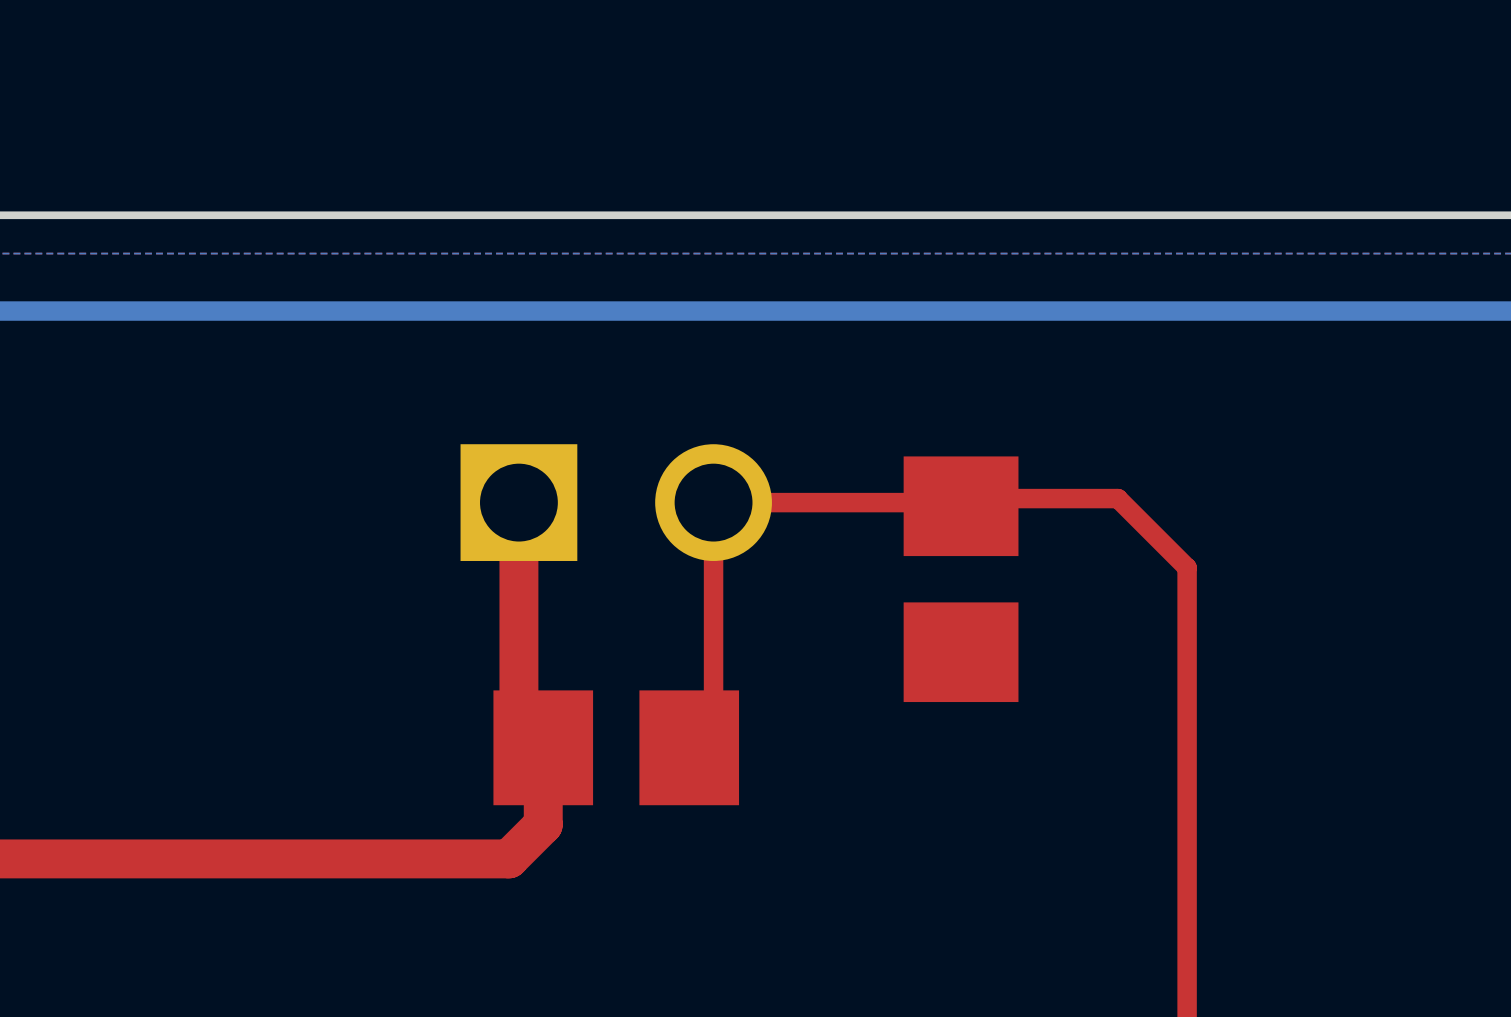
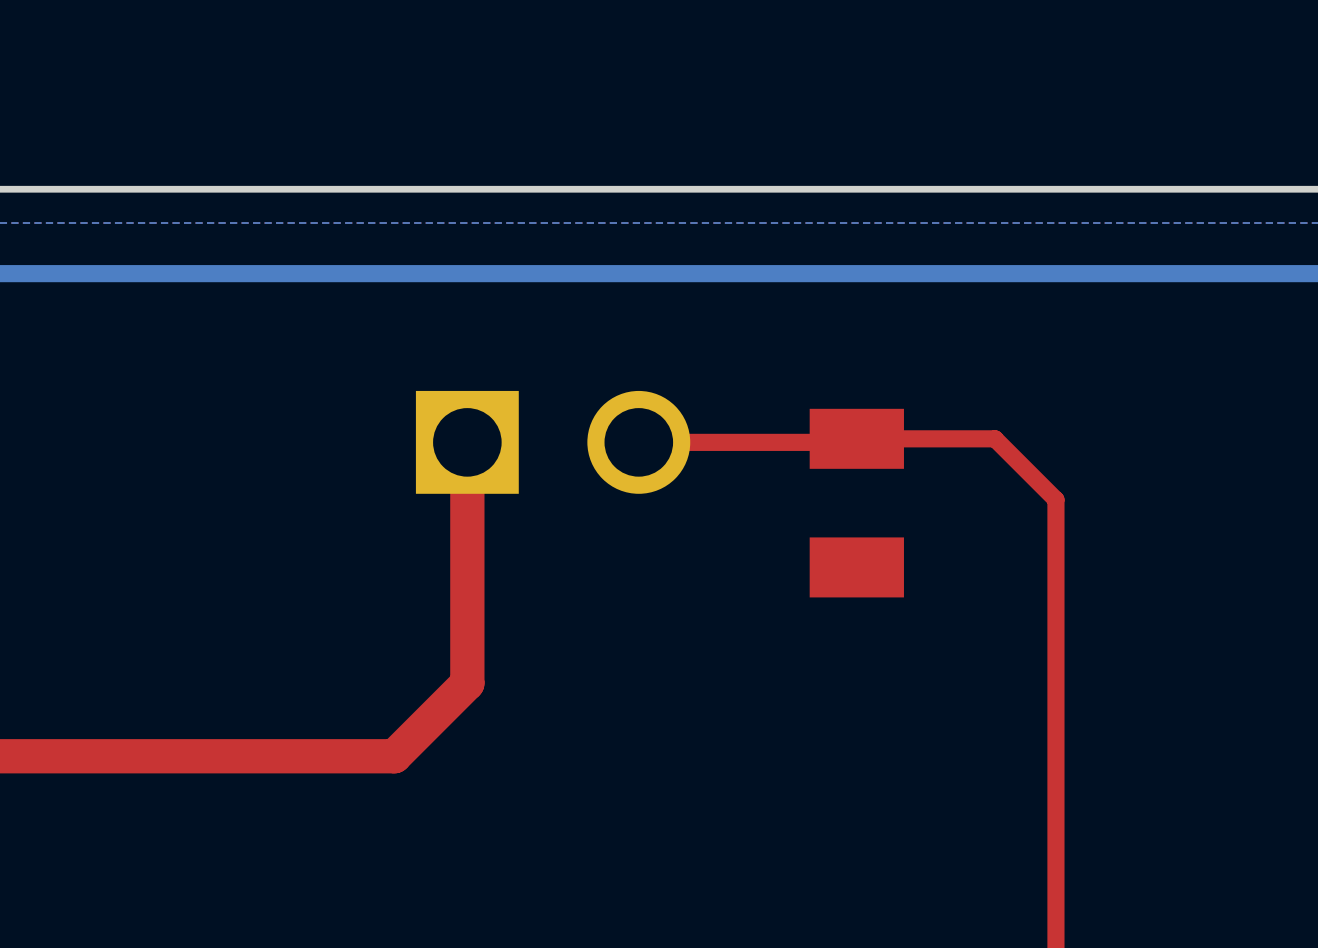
part footprint: [903, 456, 1019, 703] -> [809, 408, 904, 598]
top track: (713, 502) (713, 723) (689, 747) -> none
top track: (518, 723) (543, 747) (543, 824) (508, 858) (436, 858) -> (467, 636) (467, 683) (394, 756)
part: (616, 747) -> none

